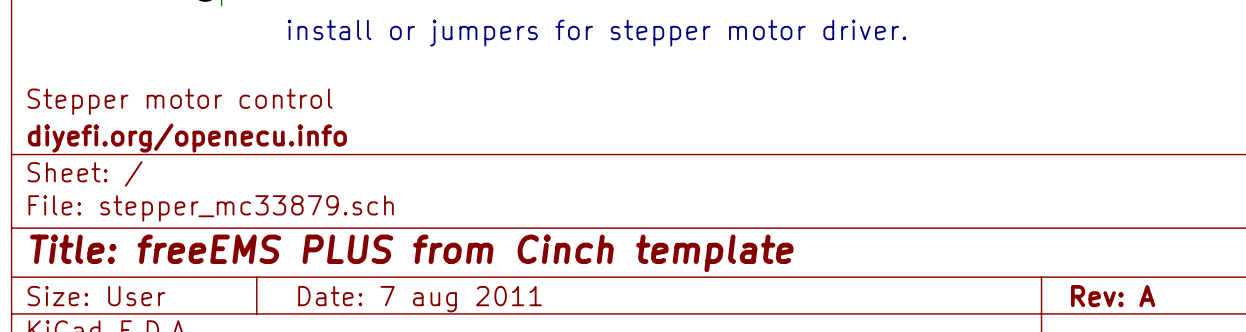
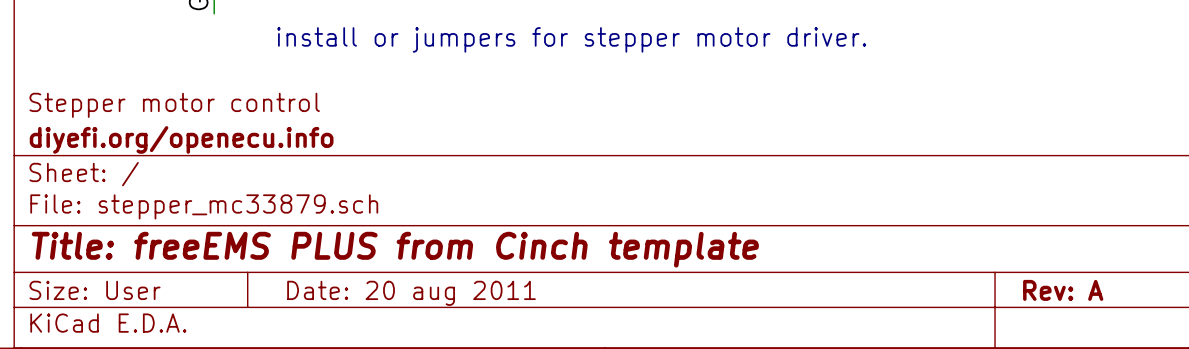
title block: Date: 7 aug 2011 (420, 299) -> Date: 20 aug 2011 (411, 293)

